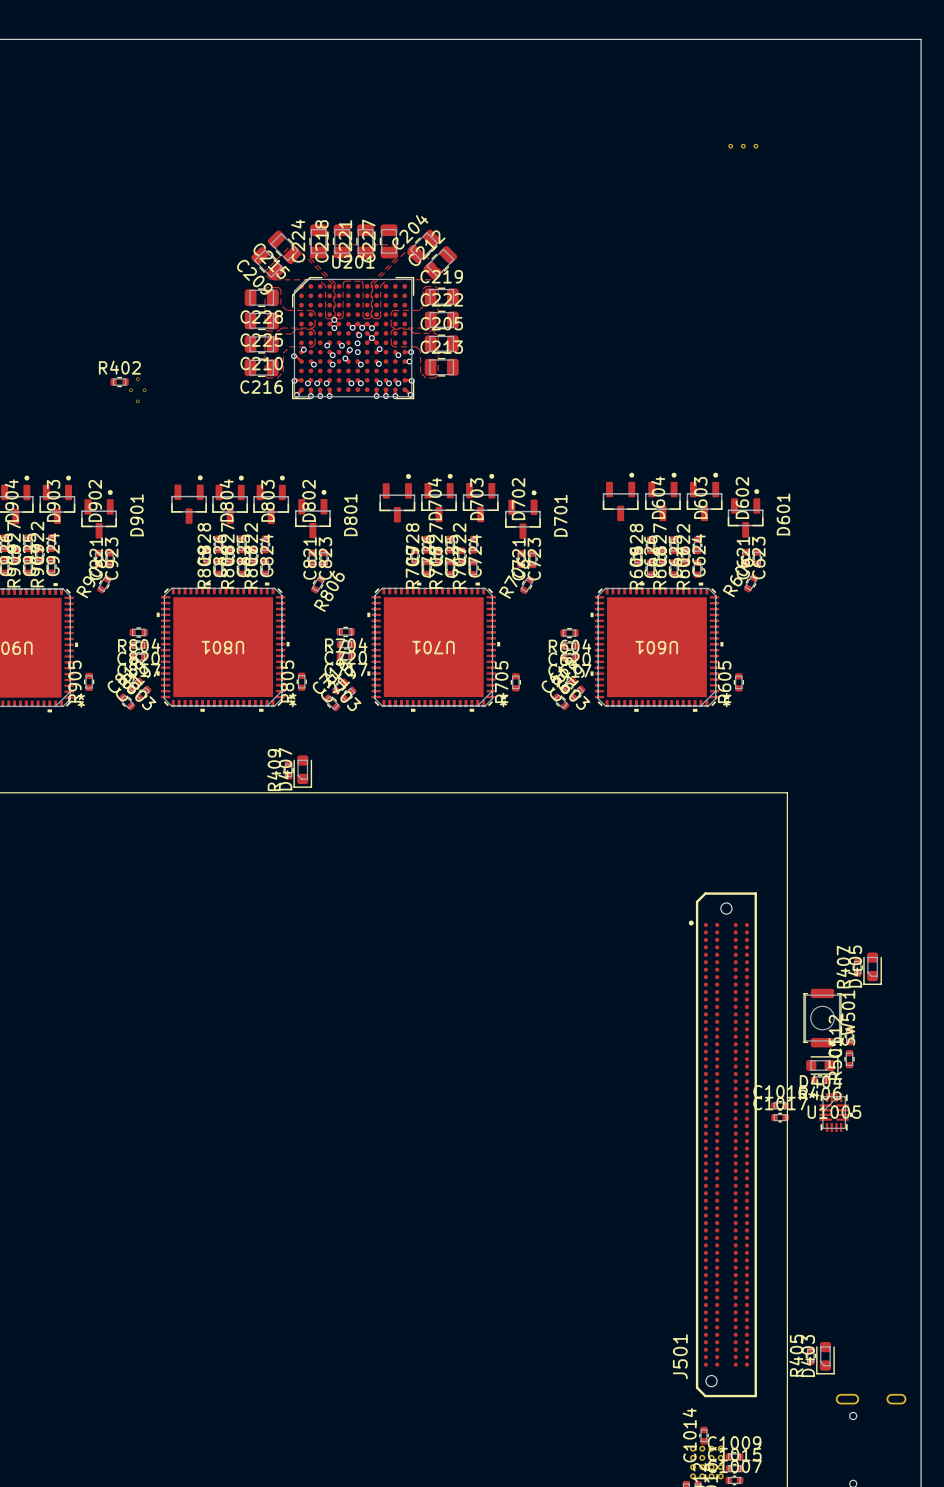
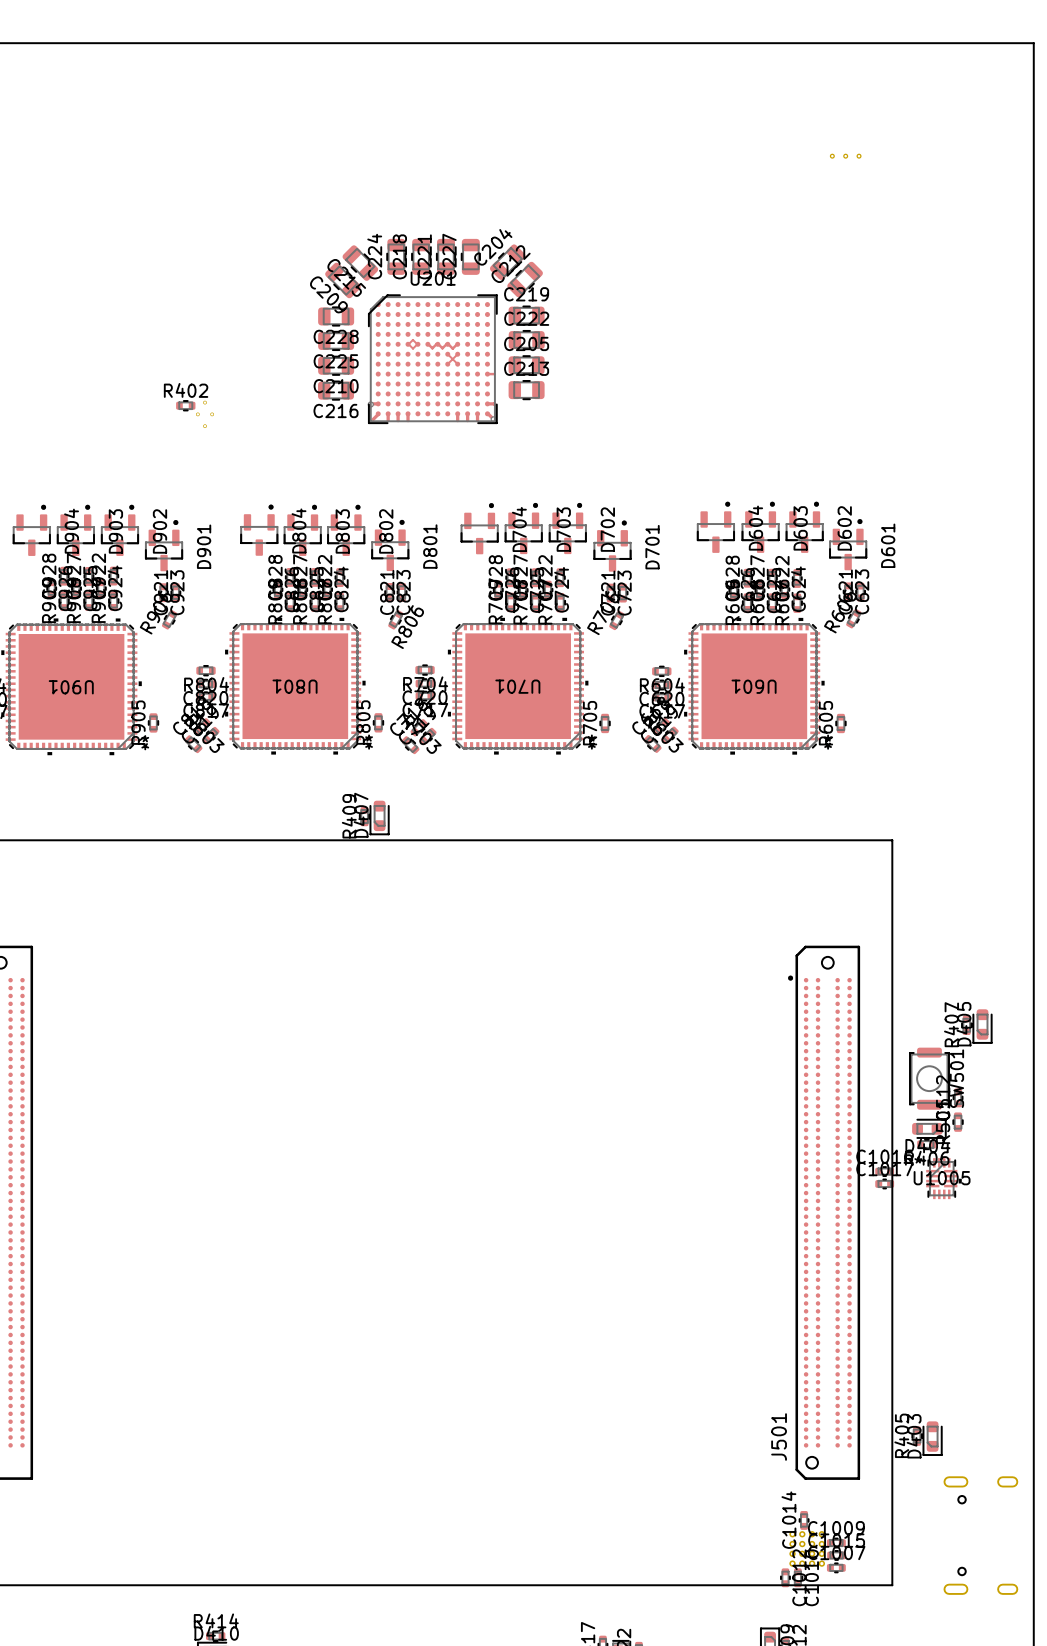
zone outline: (310, 244) (397, 244) (397, 256) (371, 282) (371, 316) (369, 318) (363, 316) (363, 282) (361, 281) (344, 281) (343, 282) (343, 316) (337, 318) (335, 316) (335, 283) (310, 258) (310, 244) -> none
zone outline: (290, 245) (294, 245) (333, 285) (333, 317) (332, 318) (325, 317) (325, 285) (319, 279) (270, 279) (263, 272) (290, 245) -> none
zone outline: (411, 245) (415, 245) (442, 272) (435, 279) (386, 279) (380, 285) (380, 316) (374, 318) (372, 316) (372, 284) (411, 245) -> none
zone outline: (435, 286) (425, 286) (423, 289) (422, 306) (419, 310) (393, 310) (391, 312) (391, 325) (393, 328) (423, 328) (426, 331) (435, 331) (438, 328) (438, 289) (435, 286) -> none
zone outline: (266, 287) (278, 287) (280, 289) (280, 304) (286, 310) (312, 310) (314, 312) (314, 325) (312, 328) (281, 328) (278, 331) (266, 331) (265, 329) (265, 289) (266, 287) -> none
via: (334, 319) -> none
via: (352, 327) -> none
via: (362, 327) -> none
via: (334, 328) -> none
via: (371, 328) -> none
zone outline: (296, 329) (312, 329) (314, 331) (314, 344) (312, 346) (289, 346) (283, 353) (283, 372) (277, 377) (267, 377) (265, 375) (265, 336) (267, 333) (291, 333) (296, 329) -> none
zone outline: (393, 329) (391, 331) (391, 344) (393, 346) (416, 346) (420, 350) (420, 372) (425, 377) (435, 377) (438, 375) (438, 336) (435, 333) (414, 333) (410, 329) (393, 329) -> none
via: (359, 335) -> none
via: (371, 338) -> none
via: (357, 343) -> none
via: (327, 345) -> none
via: (341, 345) -> none
via: (303, 349) -> none
via: (349, 349) -> none
via: (379, 349) -> none
via: (357, 352) -> none
via: (411, 352) -> none
via: (332, 355) -> none
via: (398, 355) -> none
track: (293, 356) (301, 361) -> none
via: (293, 356) -> none
via: (345, 358) -> none
via: (409, 361) -> none
via: (378, 363) -> none
via: (313, 364) -> none
via: (332, 364) -> none
via: (360, 364) -> none
via: (411, 380) -> none
via: (307, 383) -> none
via: (317, 383) -> none
via: (326, 383) -> none
via: (351, 383) -> none
via: (360, 383) -> none
via: (379, 383) -> none
via: (389, 383) -> none
via: (398, 383) -> none
via: (296, 394) -> none
via: (310, 396) -> none
via: (320, 396) -> none
via: (329, 396) -> none
via: (376, 396) -> none
via: (385, 396) -> none
via: (395, 396) -> none

